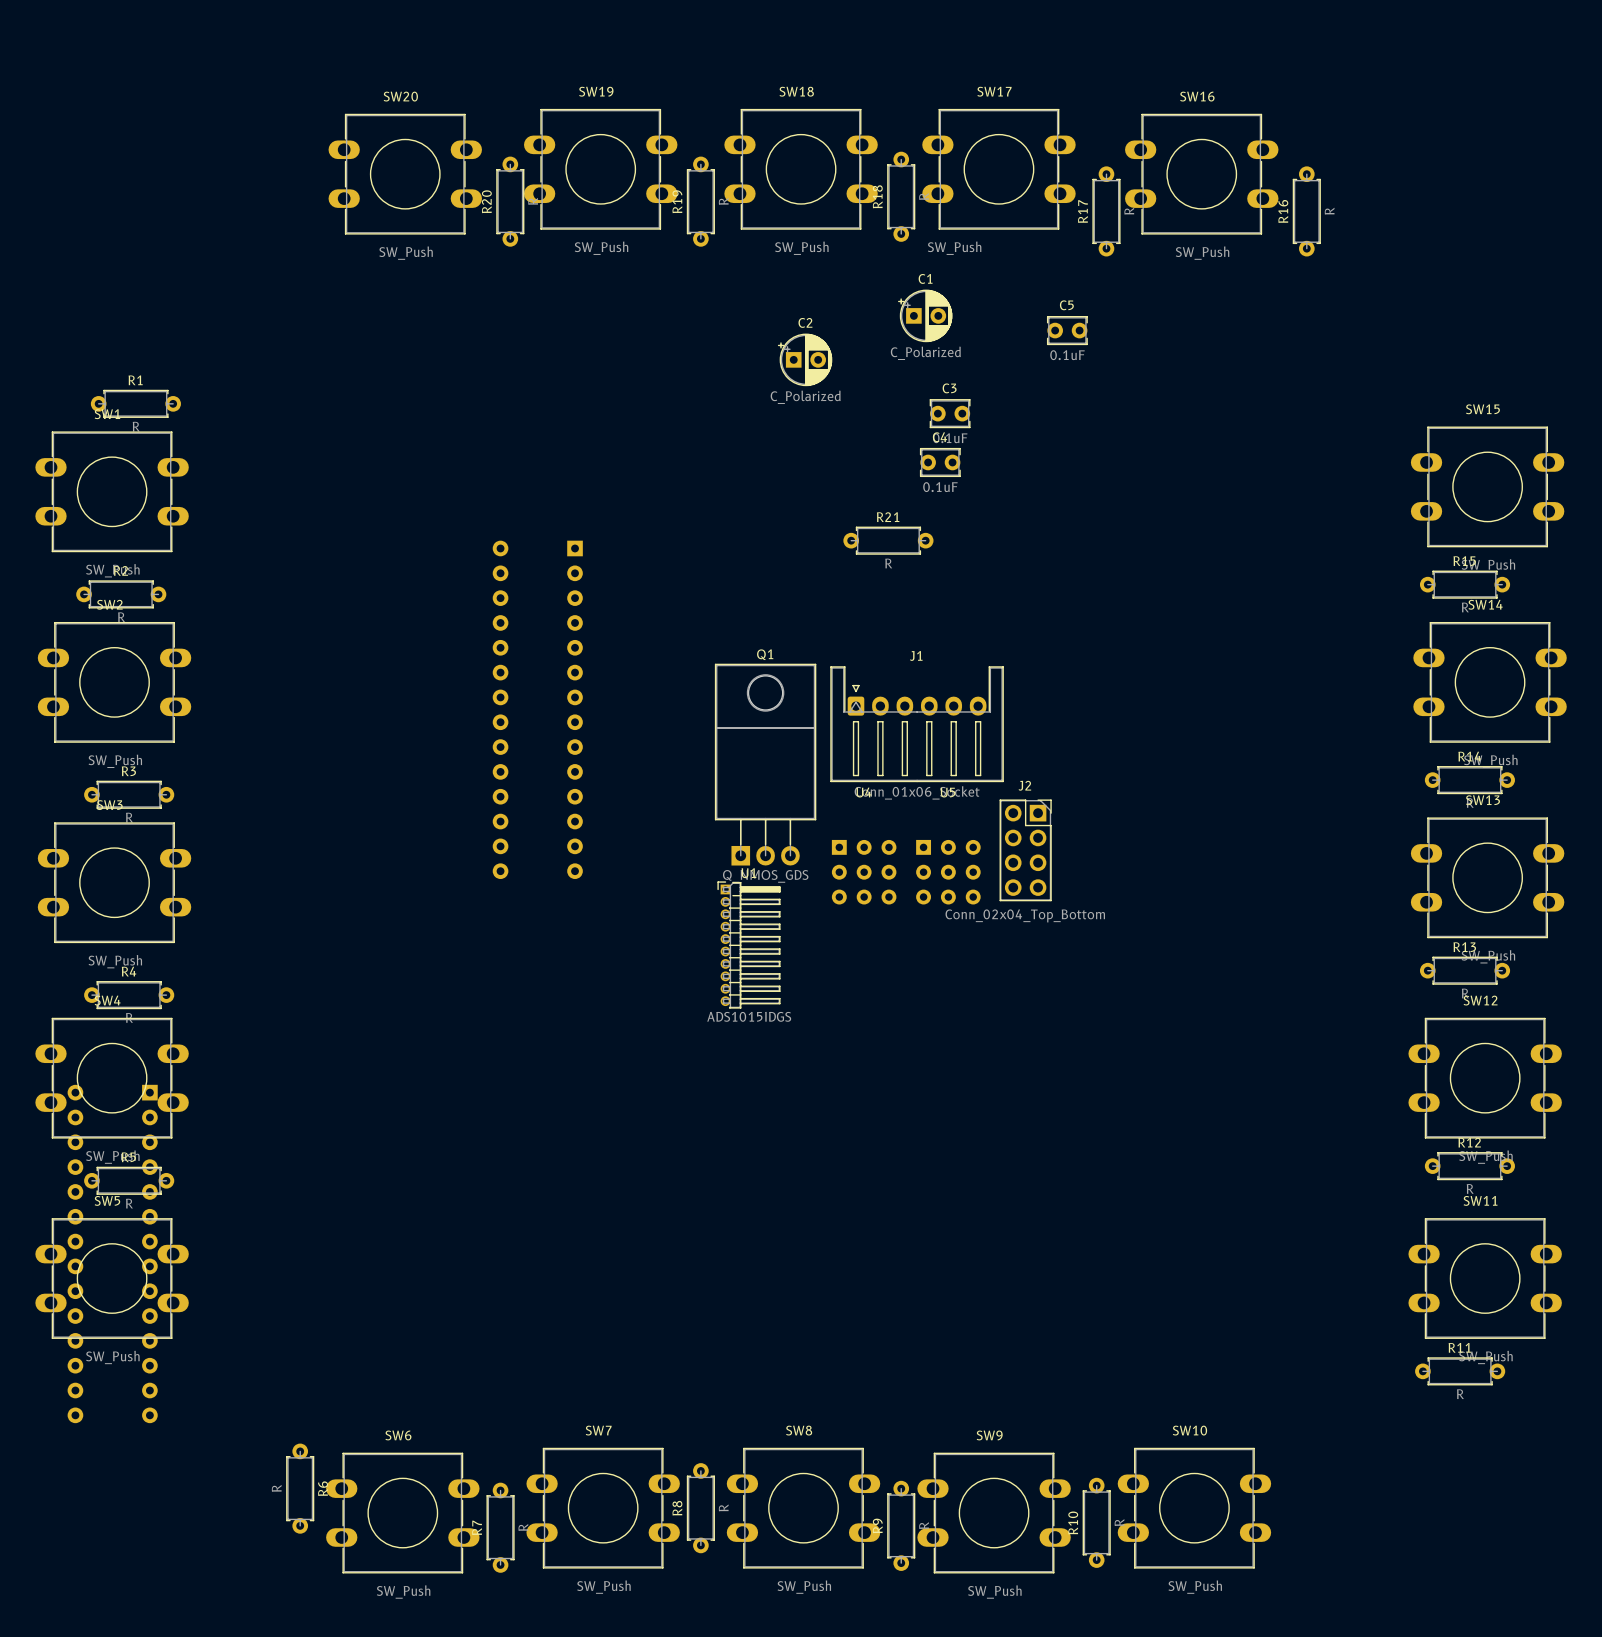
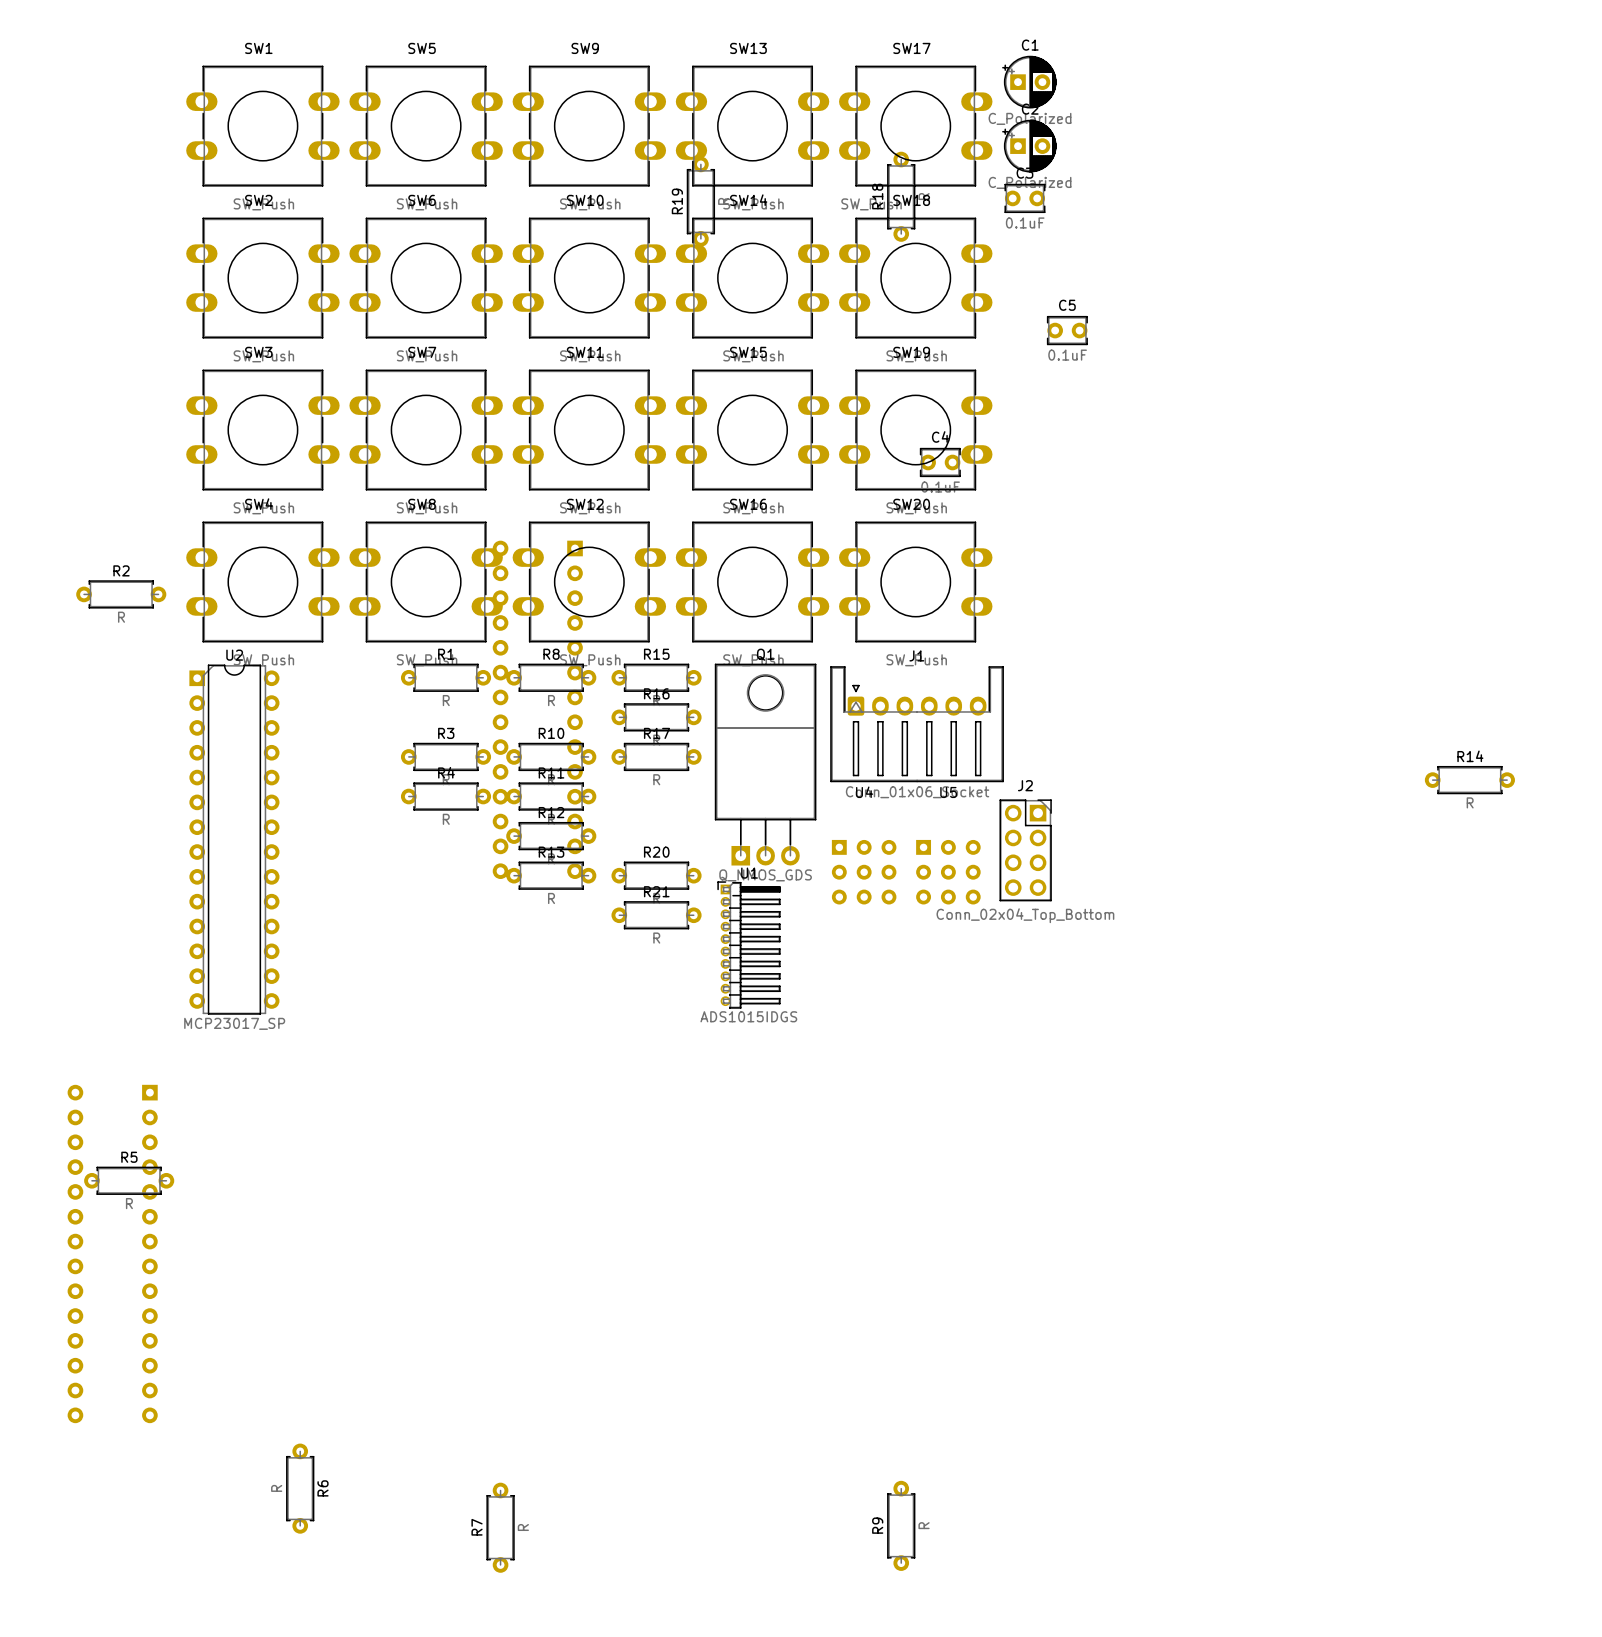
SW19 position: (600, 169) -> (915, 430)
SW18 position: (801, 169) -> (915, 278)
SW17 position: (998, 169) -> (915, 126)
SW20 position: (405, 174) -> (915, 582)
SW16 position: (1201, 174) -> (752, 582)
R20 rotation: 0° (510, 201) -> 90° clockwise (656, 875)
R20 position: (510, 201) -> (656, 875)
R17 rotation: 0° (1106, 211) -> 90° clockwise (656, 756)
R17 position: (1106, 211) -> (656, 756)
R16 rotation: 0° (1306, 211) -> 90° clockwise (656, 717)
R16 position: (1306, 211) -> (656, 717)
C1 position: (925, 315) -> (1029, 82)
C2 position: (805, 359) -> (1029, 146)
R1 position: (135, 403) -> (446, 677)
C3 position: (950, 413) -> (1024, 198)
SW15 position: (1487, 486) -> (752, 430)
SW1 position: (112, 491) -> (262, 126)
R21 position: (888, 540) -> (656, 915)
R15 position: (1465, 584) -> (656, 677)
SW2 position: (114, 682) -> (262, 278)
SW14 position: (1490, 682) -> (752, 278)
R3 position: (129, 794) -> (446, 756)
U2: none -> MCP23017_SP (234, 839)
SW13 position: (1487, 877) -> (752, 126)
SW3 position: (114, 882) -> (262, 430)
R13 position: (1465, 970) -> (551, 875)
R4 position: (129, 995) -> (446, 796)
SW4 position: (112, 1078) -> (262, 582)
SW12 position: (1485, 1078) -> (589, 582)
R12 position: (1469, 1166) -> (551, 836)
SW5 position: (112, 1278) -> (426, 126)
SW11 position: (1485, 1278) -> (589, 430)
R11 position: (1460, 1371) -> (551, 796)
SW7 position: (603, 1508) -> (426, 430)
R8 rotation: 0° (700, 1508) -> 90° clockwise (551, 677)
R8 position: (700, 1508) -> (551, 677)
SW8 position: (803, 1508) -> (426, 582)
SW10 position: (1194, 1508) -> (589, 278)
SW6 position: (402, 1513) -> (426, 278)
SW9 position: (994, 1513) -> (589, 126)
R10 rotation: 0° (1096, 1522) -> 90° clockwise (551, 756)
R10 position: (1096, 1522) -> (551, 756)

